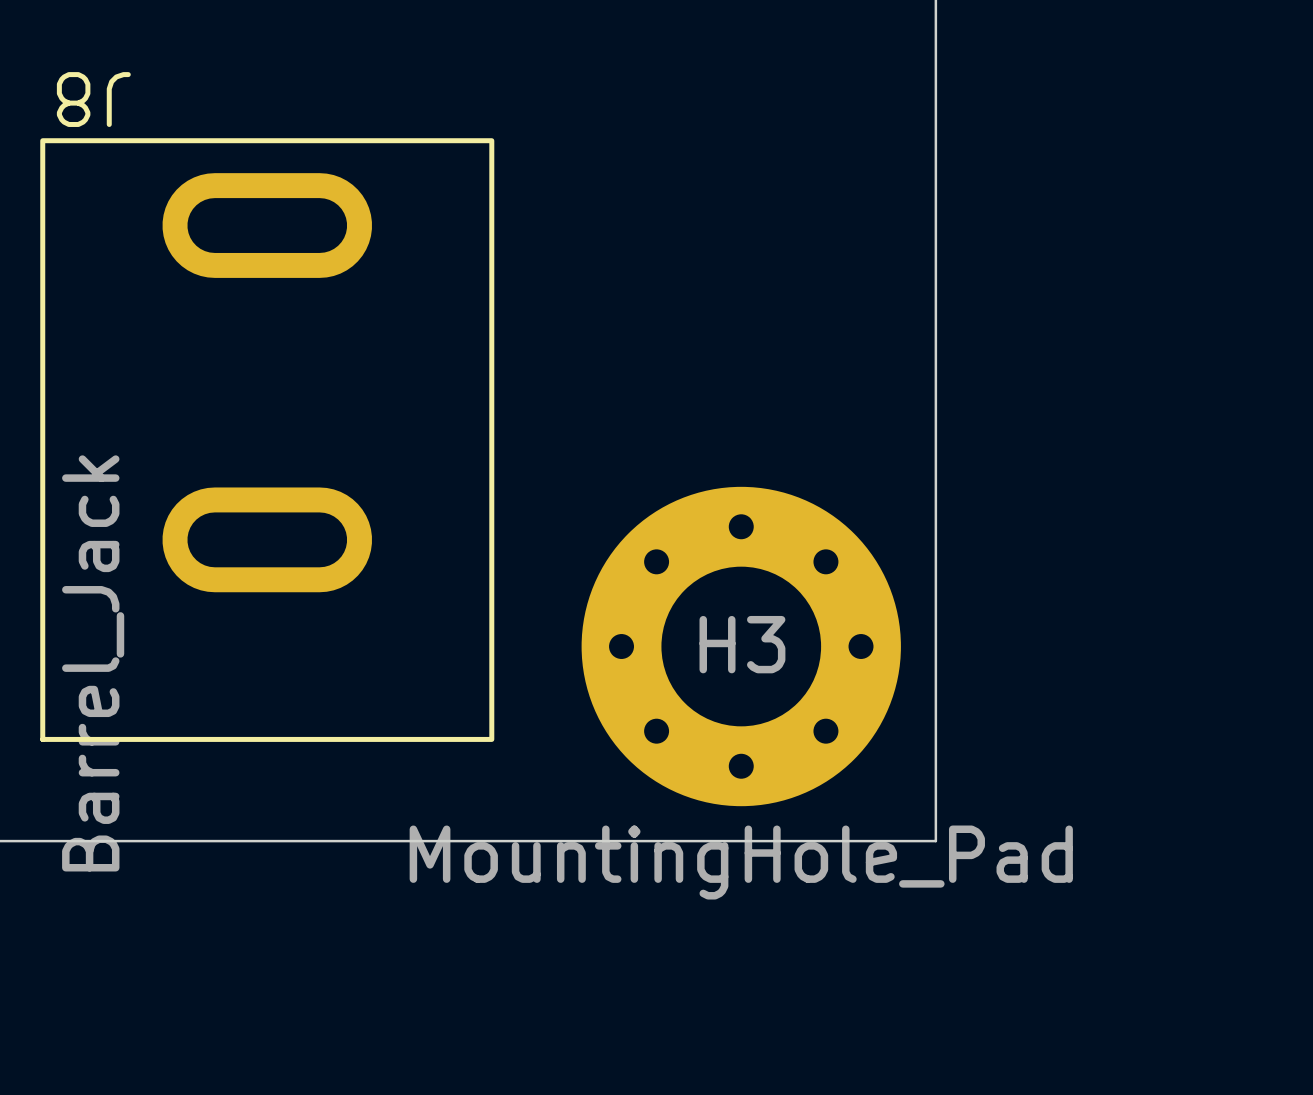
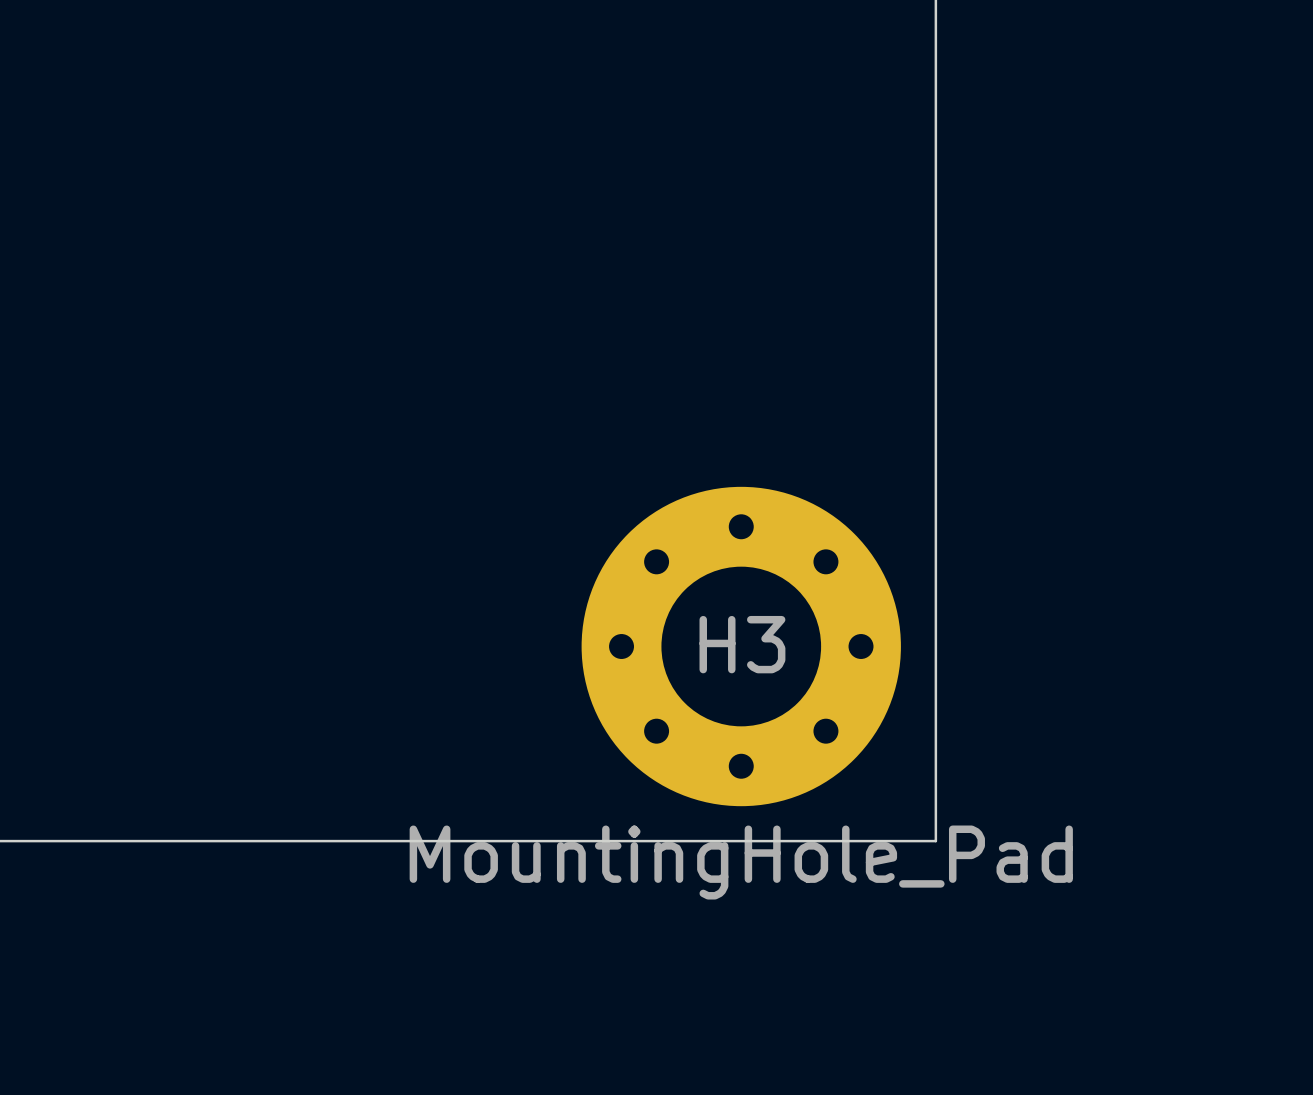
J8: Barrel_Jack (267, 440) -> none

